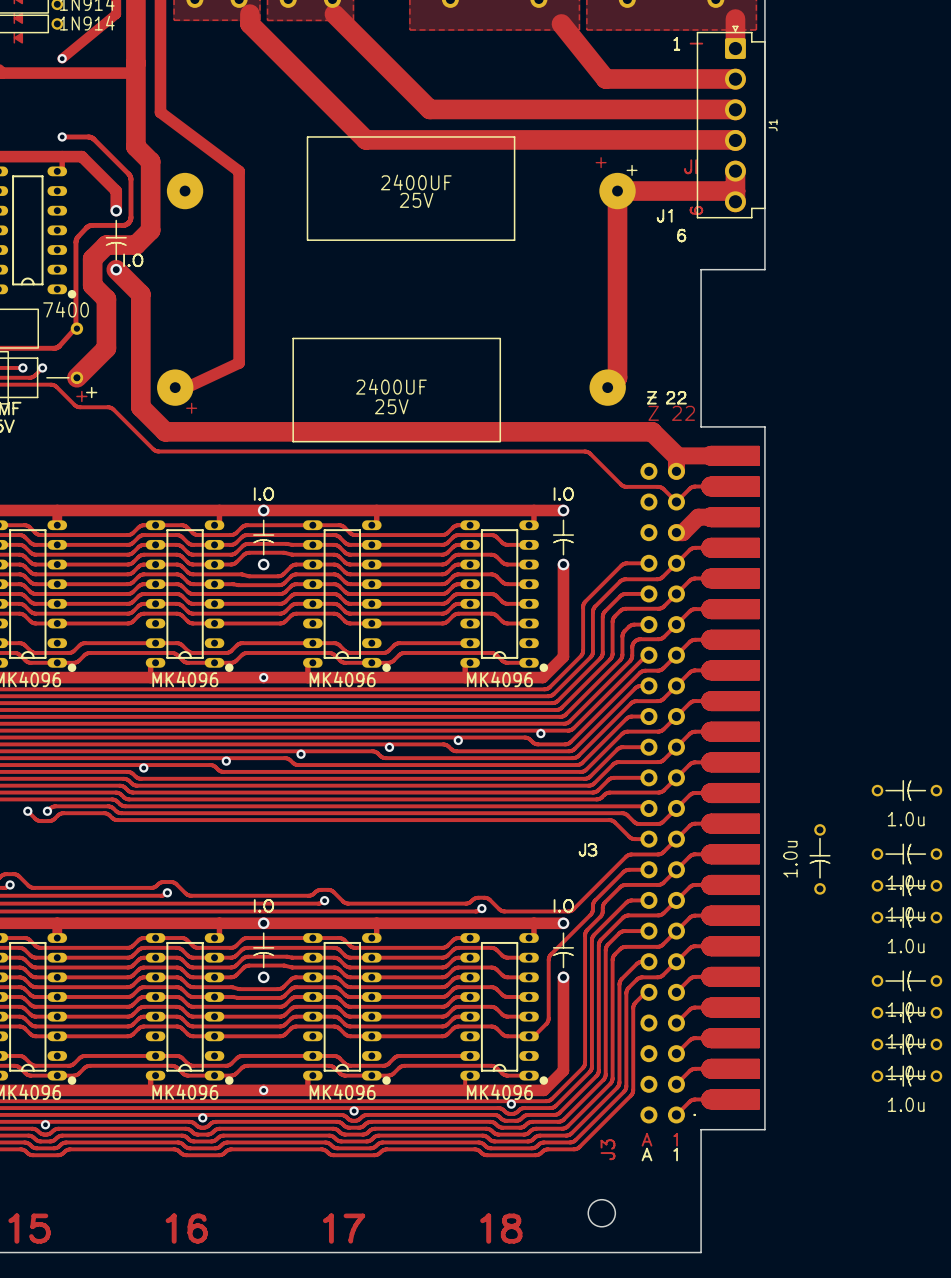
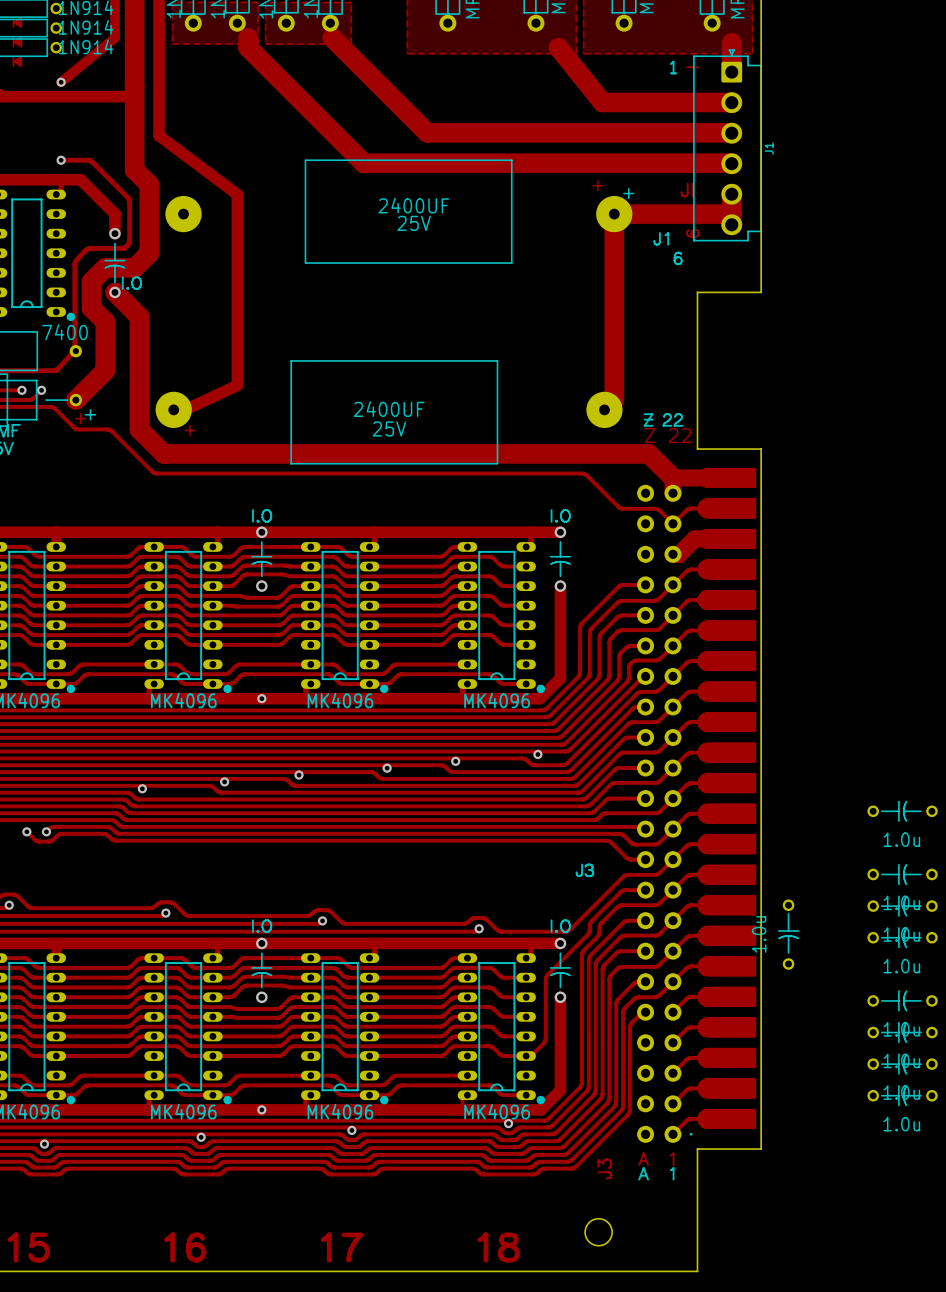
part position: (819, 859) -> (788, 934)

